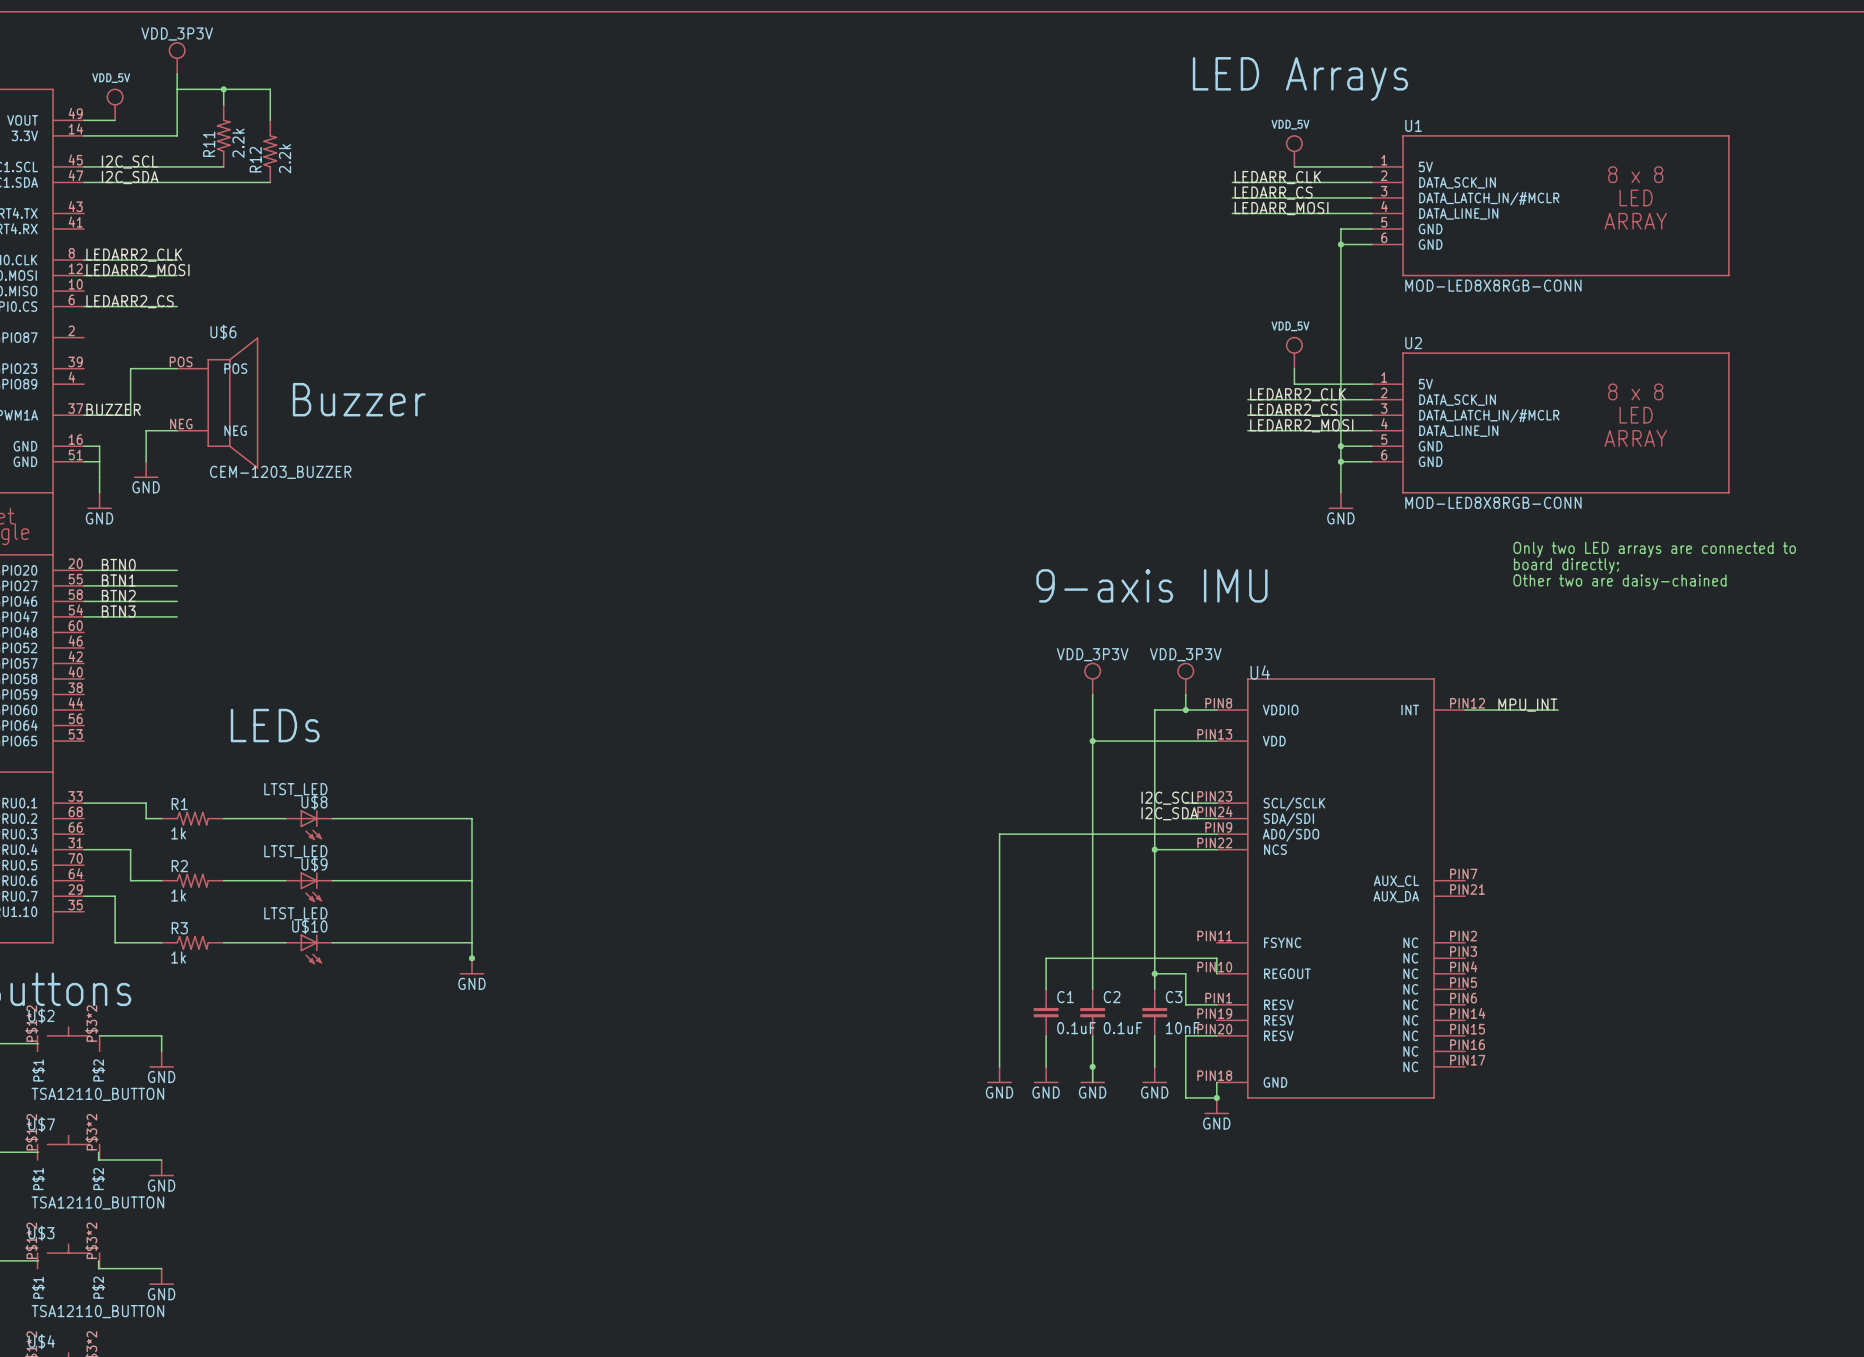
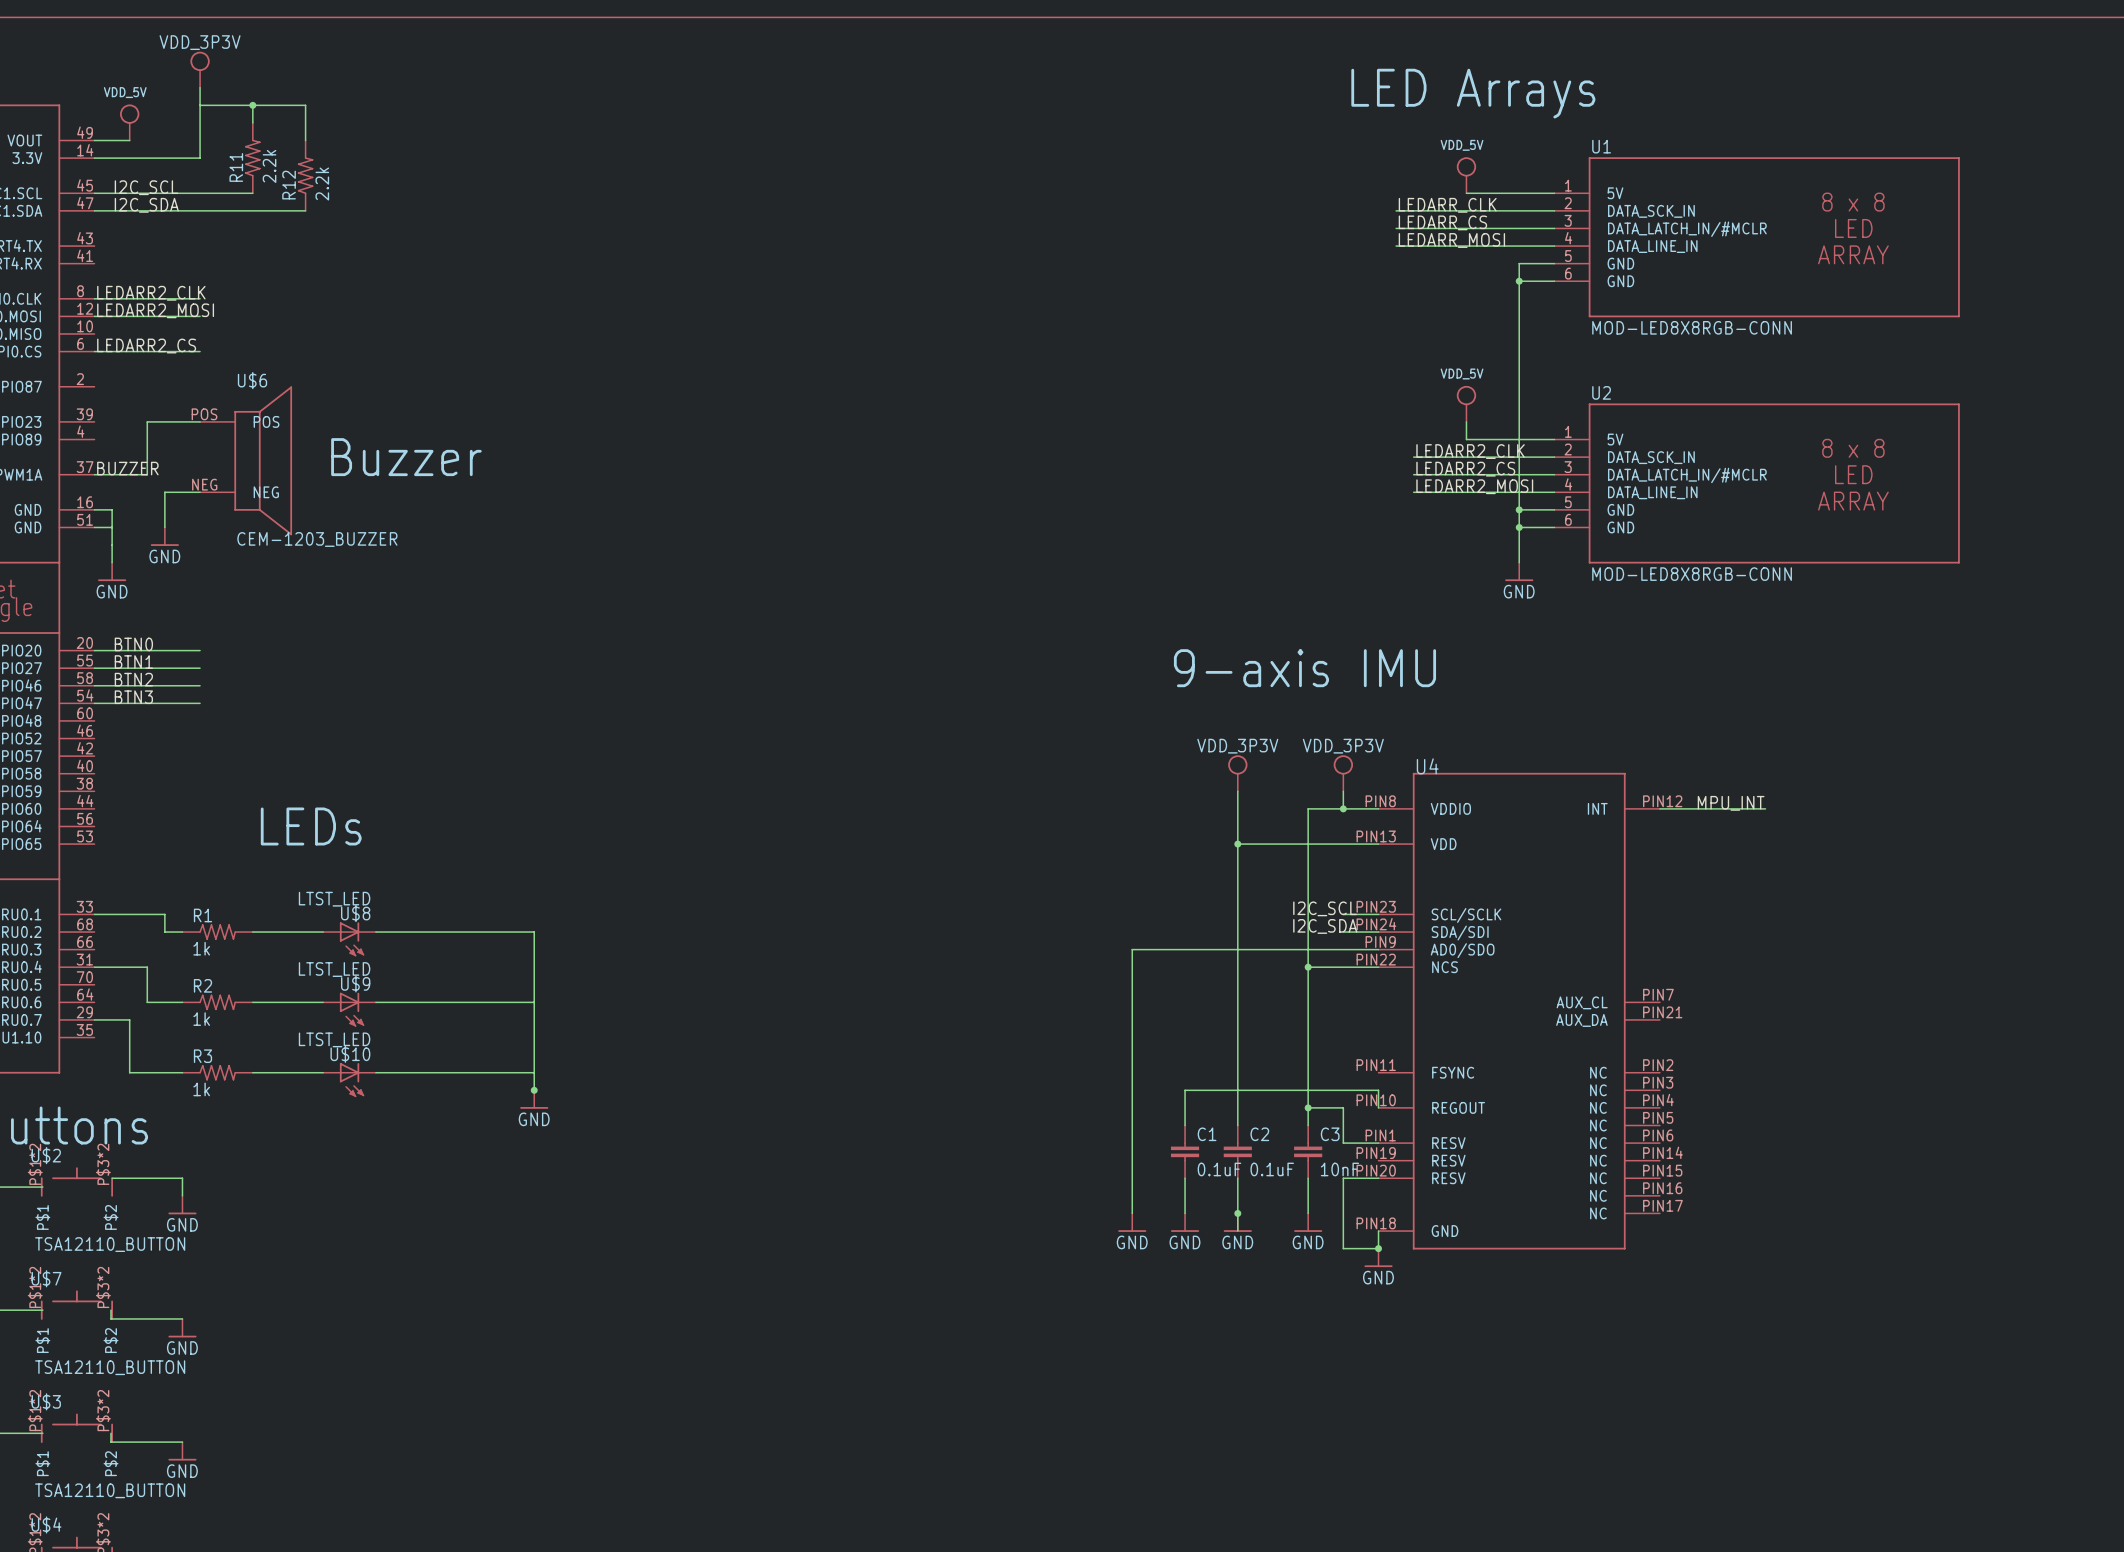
text: Only two LED arrays are connected to (1654, 549) -> none
text: board directly; (1566, 565) -> none
text: Other two are daisy-chained (1619, 582) -> none

